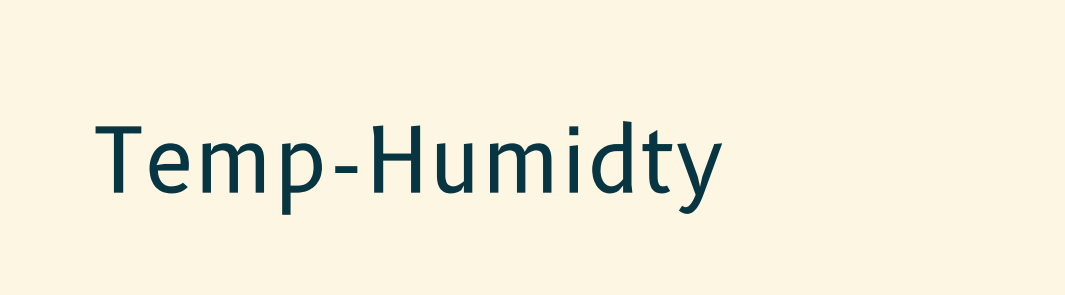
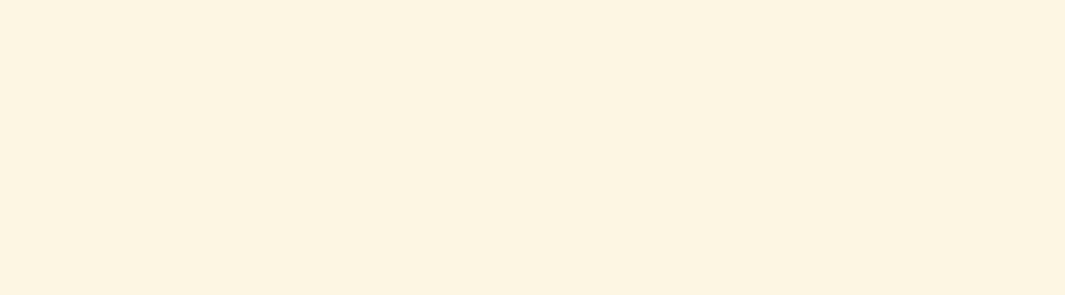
label: Temp-Humidty (408, 167) -> none

